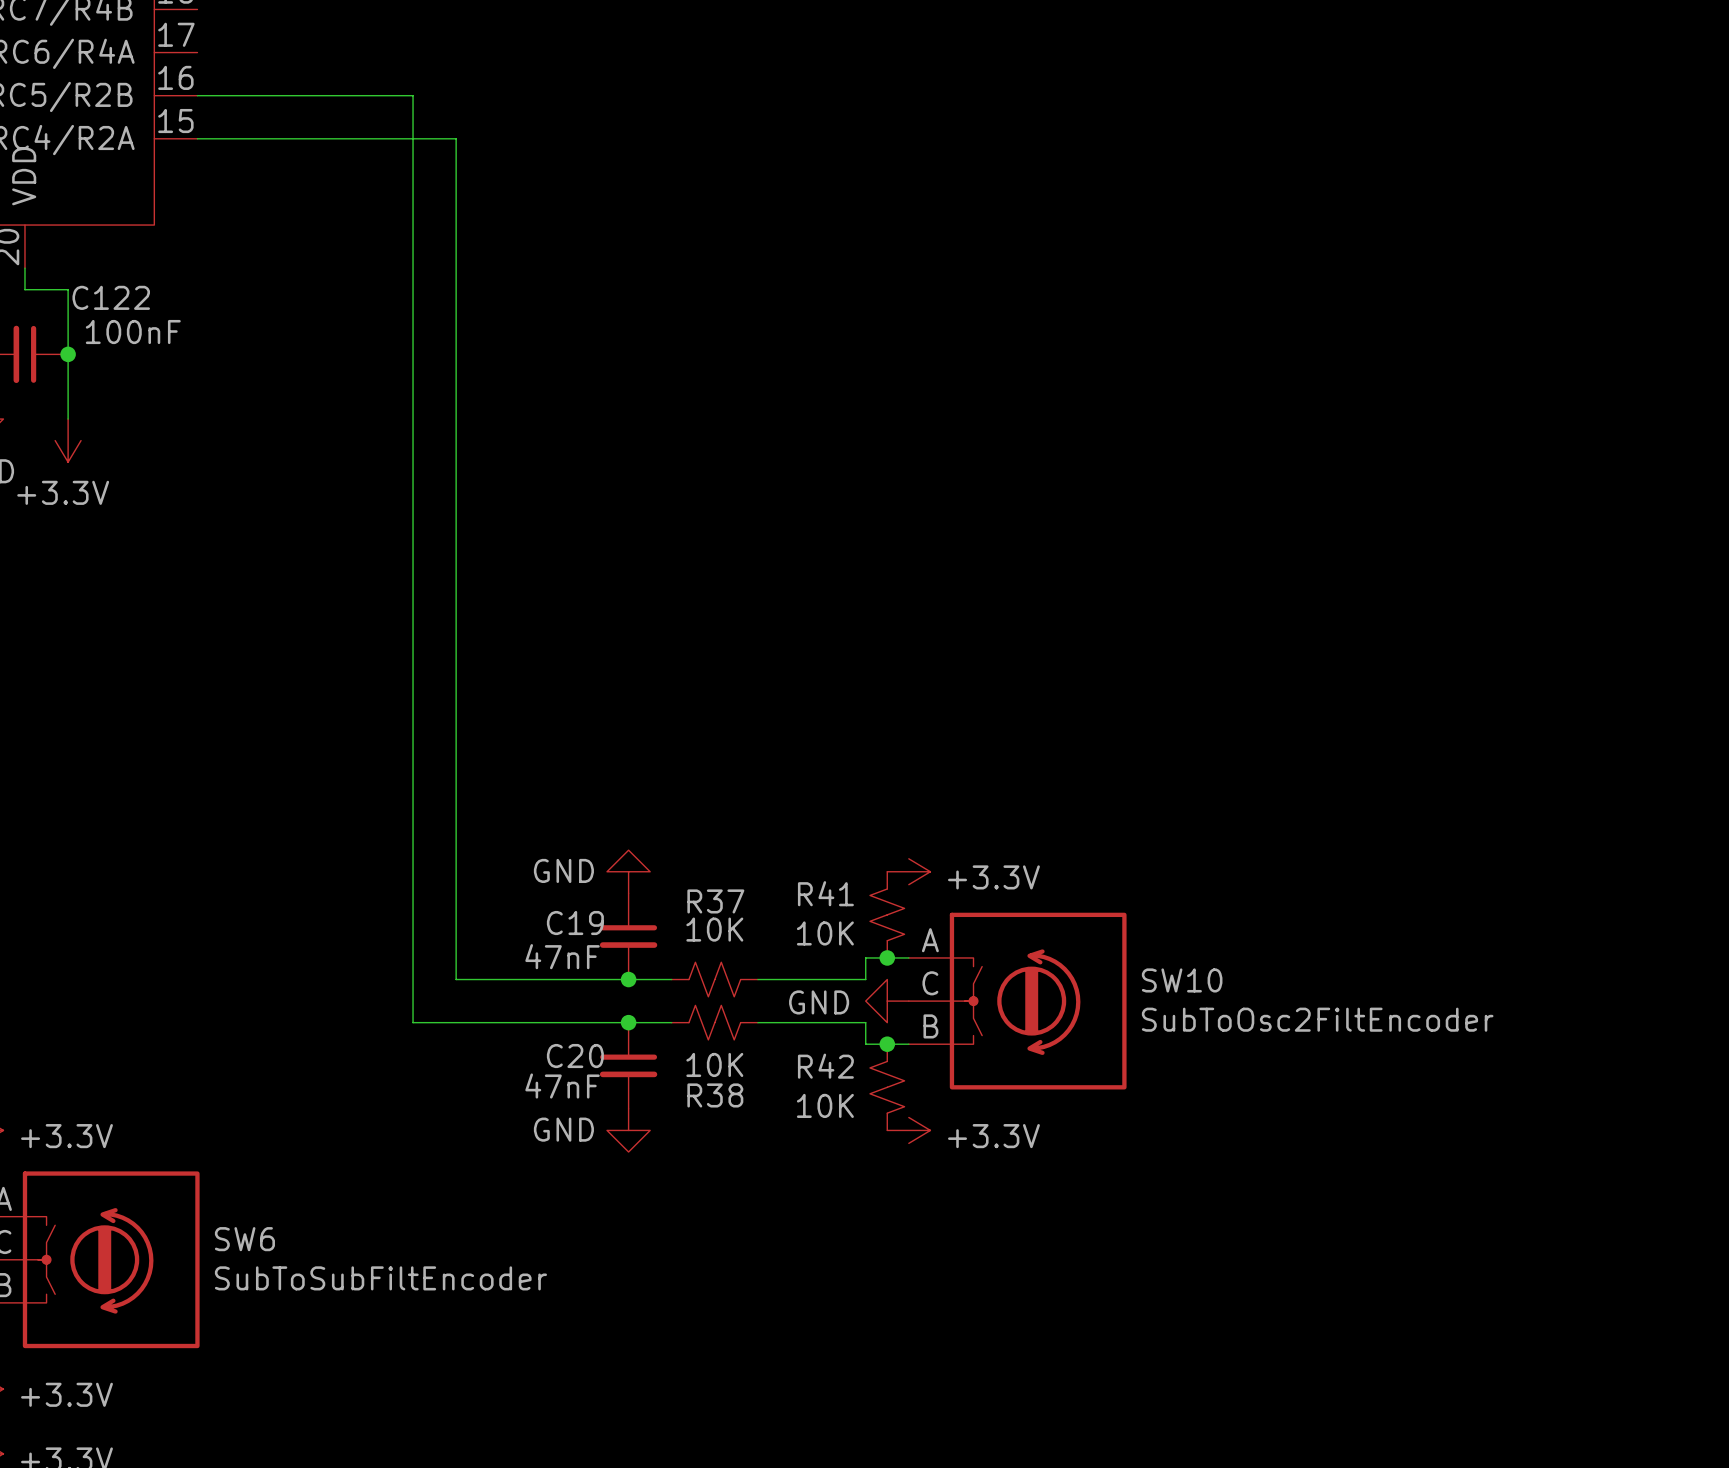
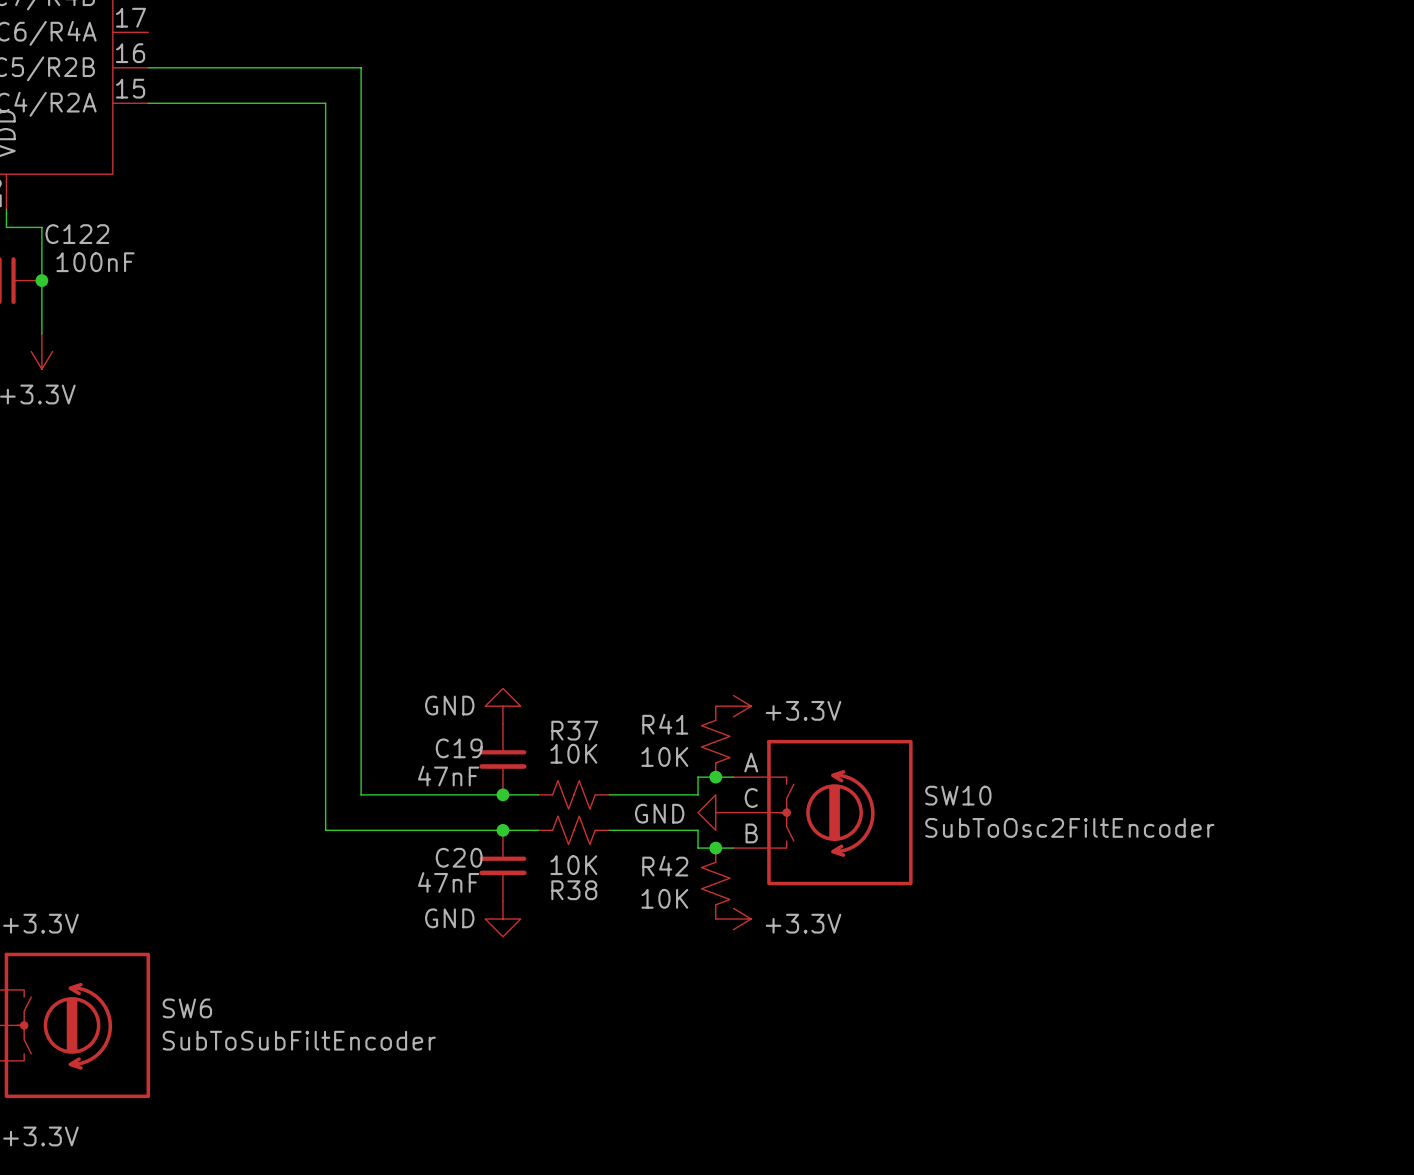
wire: (413, 95) (413, 138) (456, 138) -> (325, 67) (361, 67) (361, 103)

